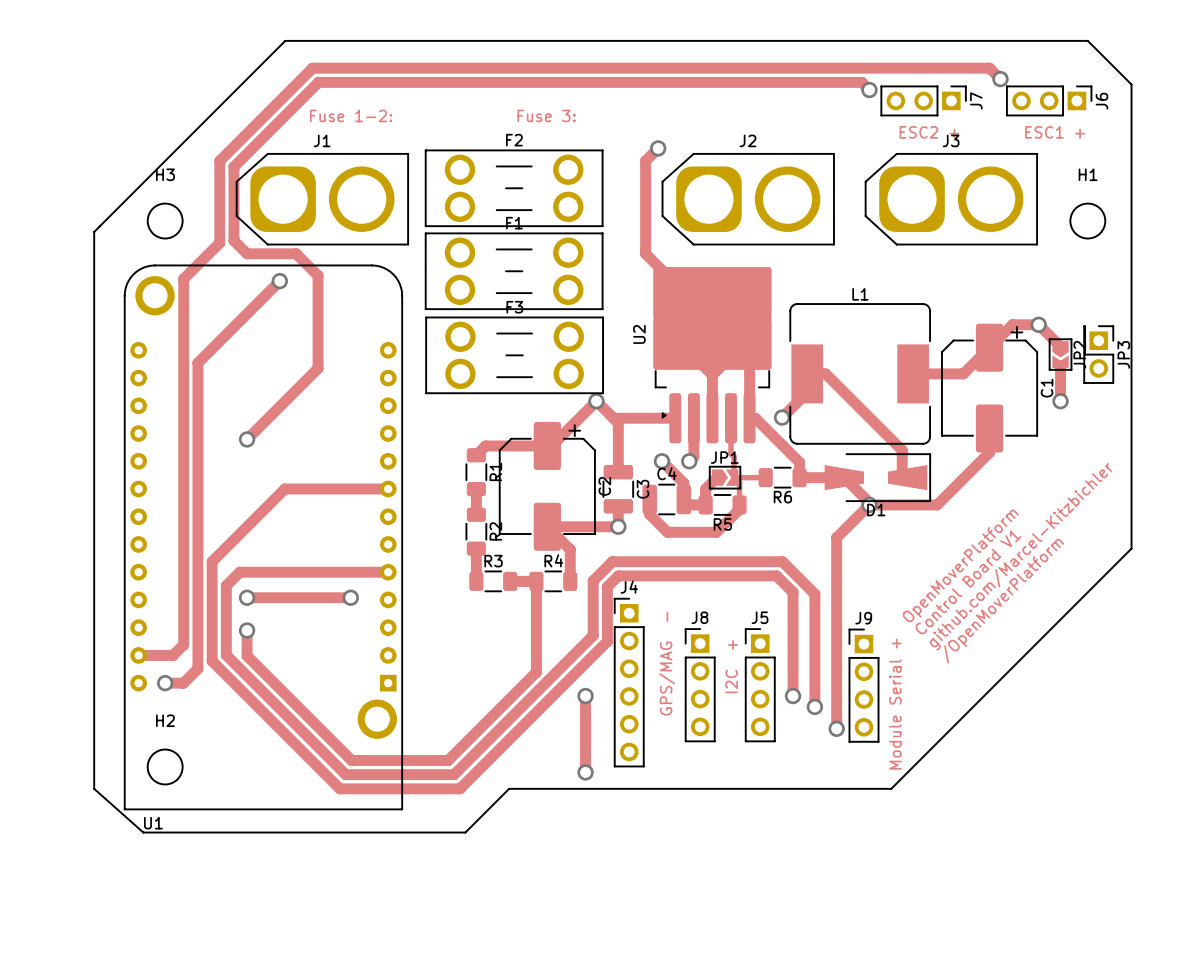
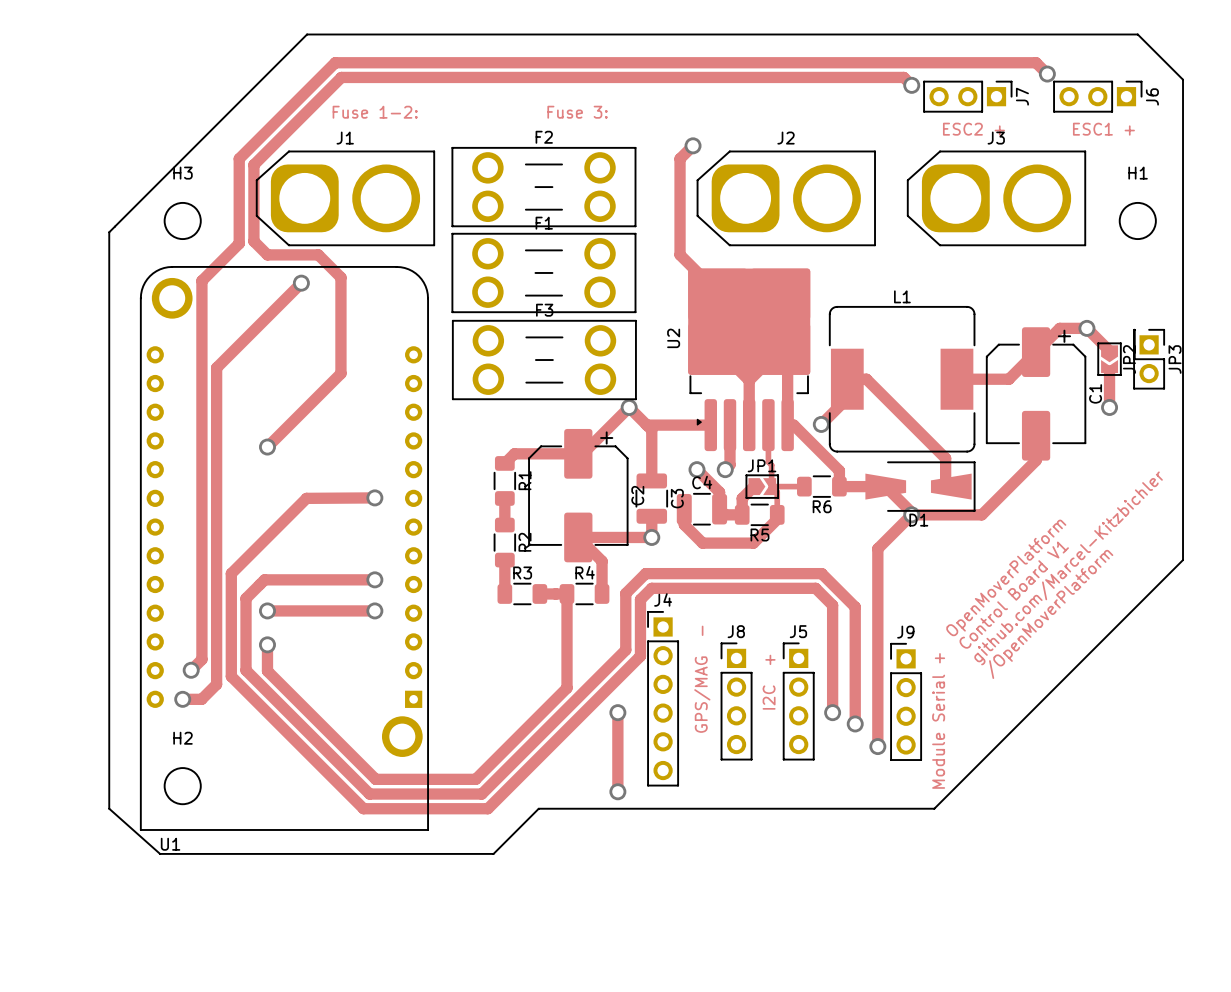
via: none -> (374, 497)
track: (284, 489) (388, 489) -> (306, 498) (374, 498)
via: none -> (374, 579)
track: (239, 572) (388, 572) -> (260, 584) (264, 579) (374, 579)
track: (138, 655) (173, 655) -> none
via: none -> (191, 670)

